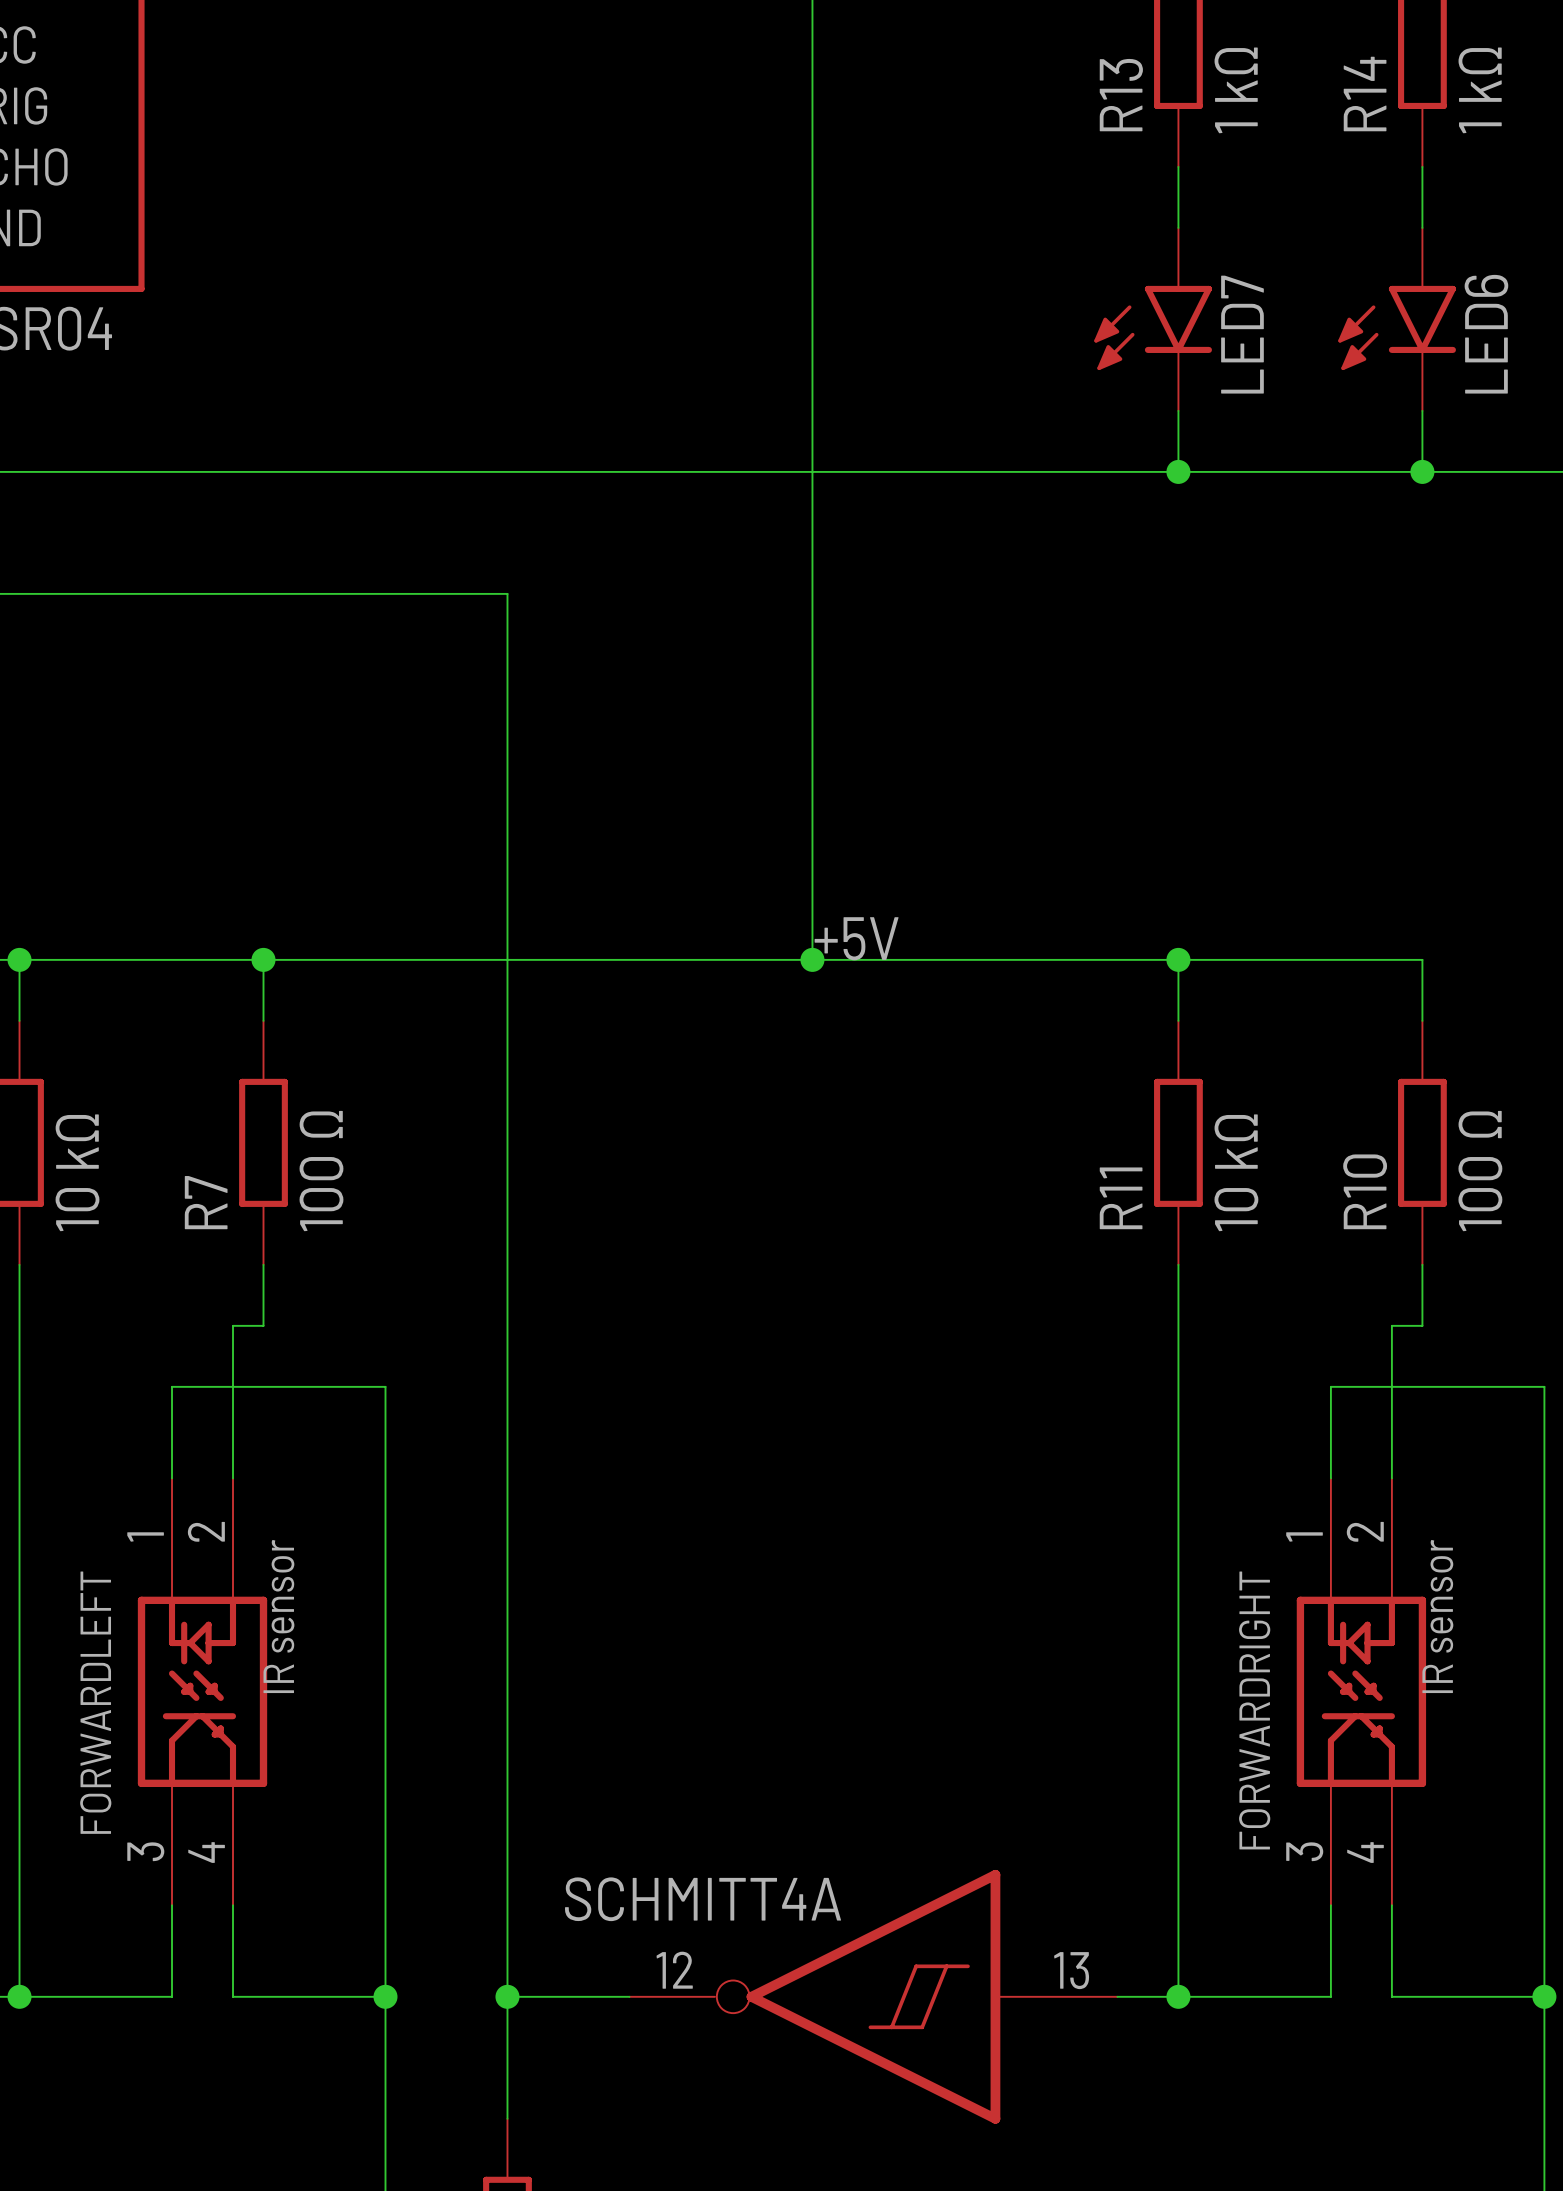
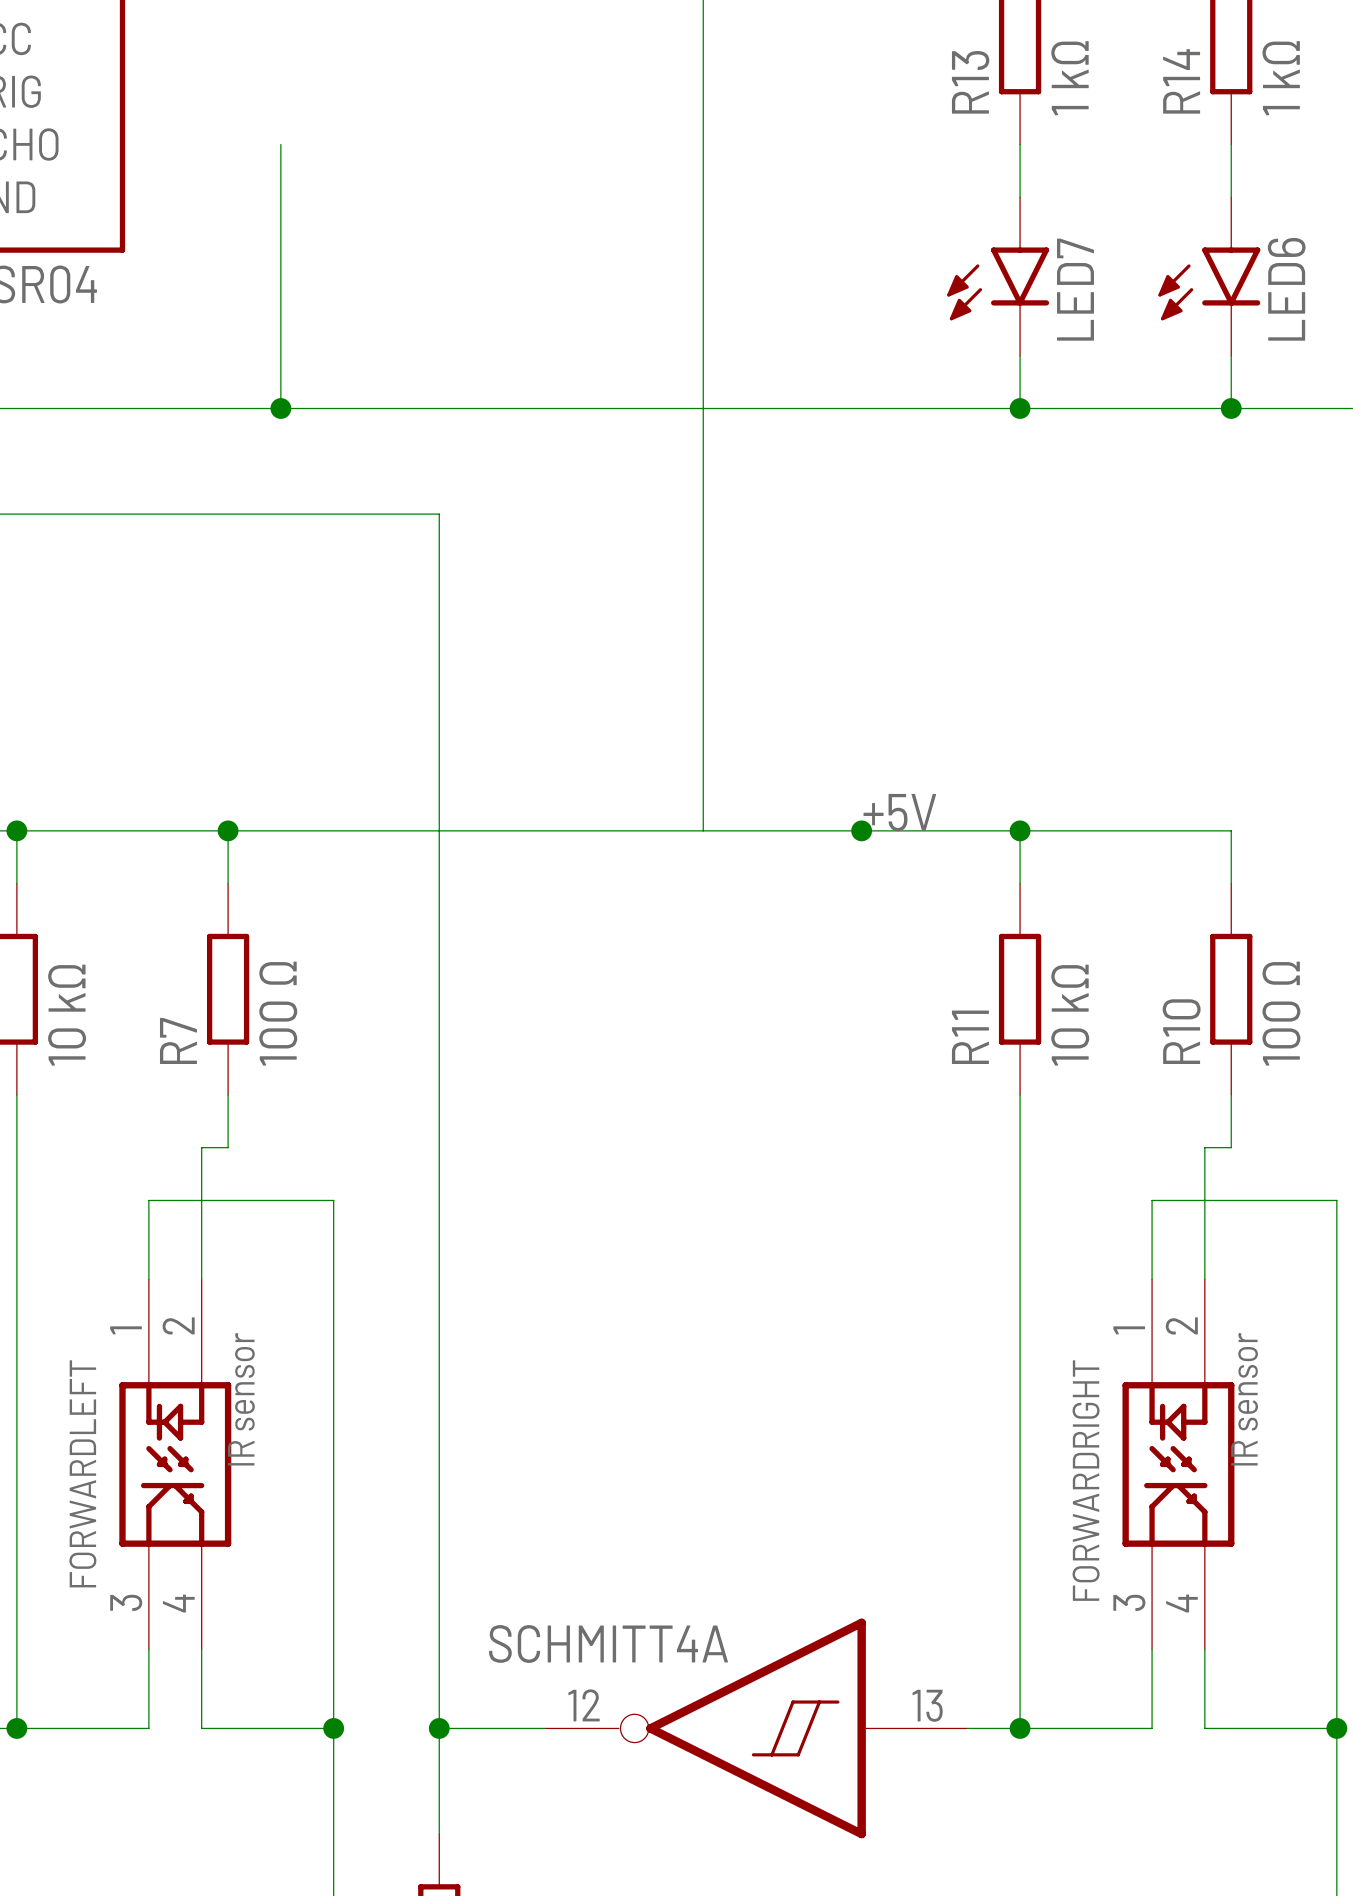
wire: none -> (280, 144) (280, 408)
junction: none -> (280, 408)
label position: +5V (856, 938) -> +5V (899, 812)
junction: (812, 959) -> none
junction: none -> (861, 830)

